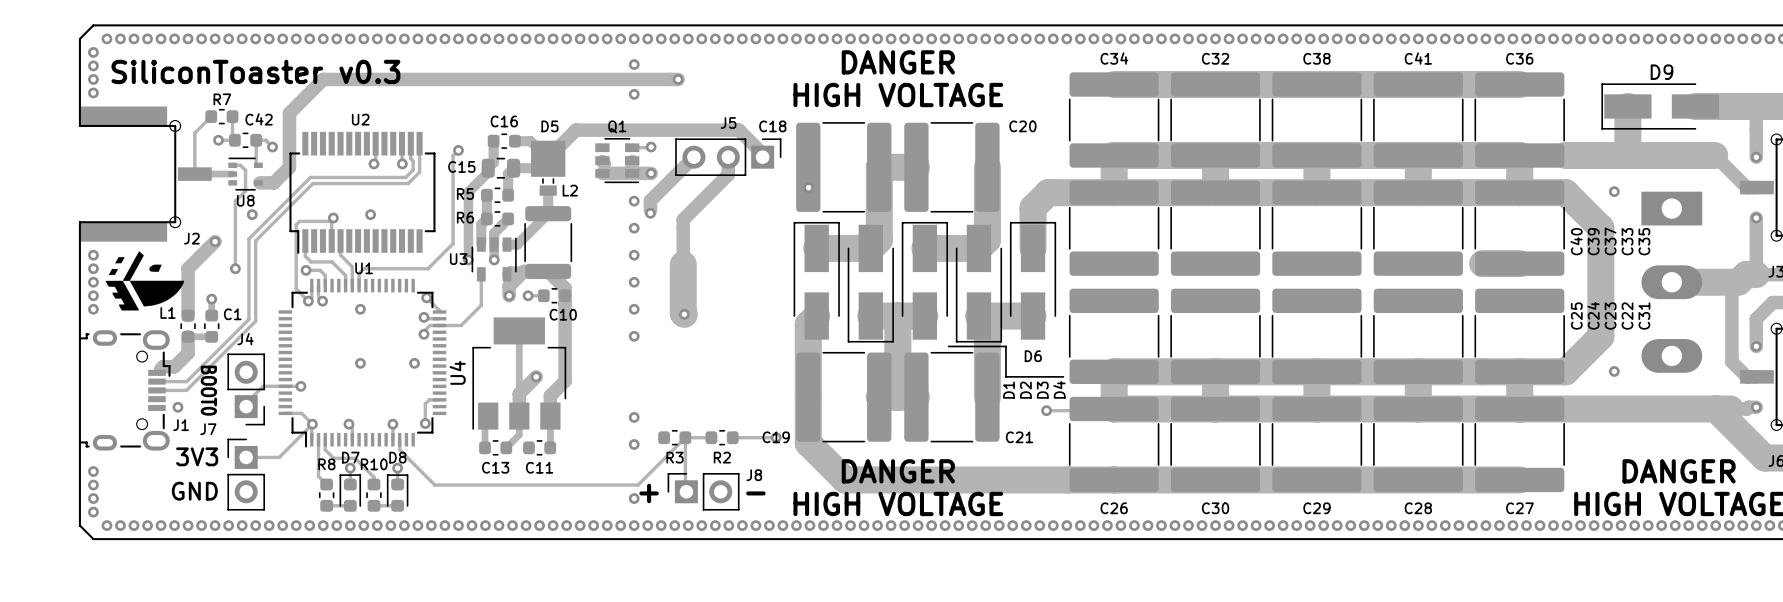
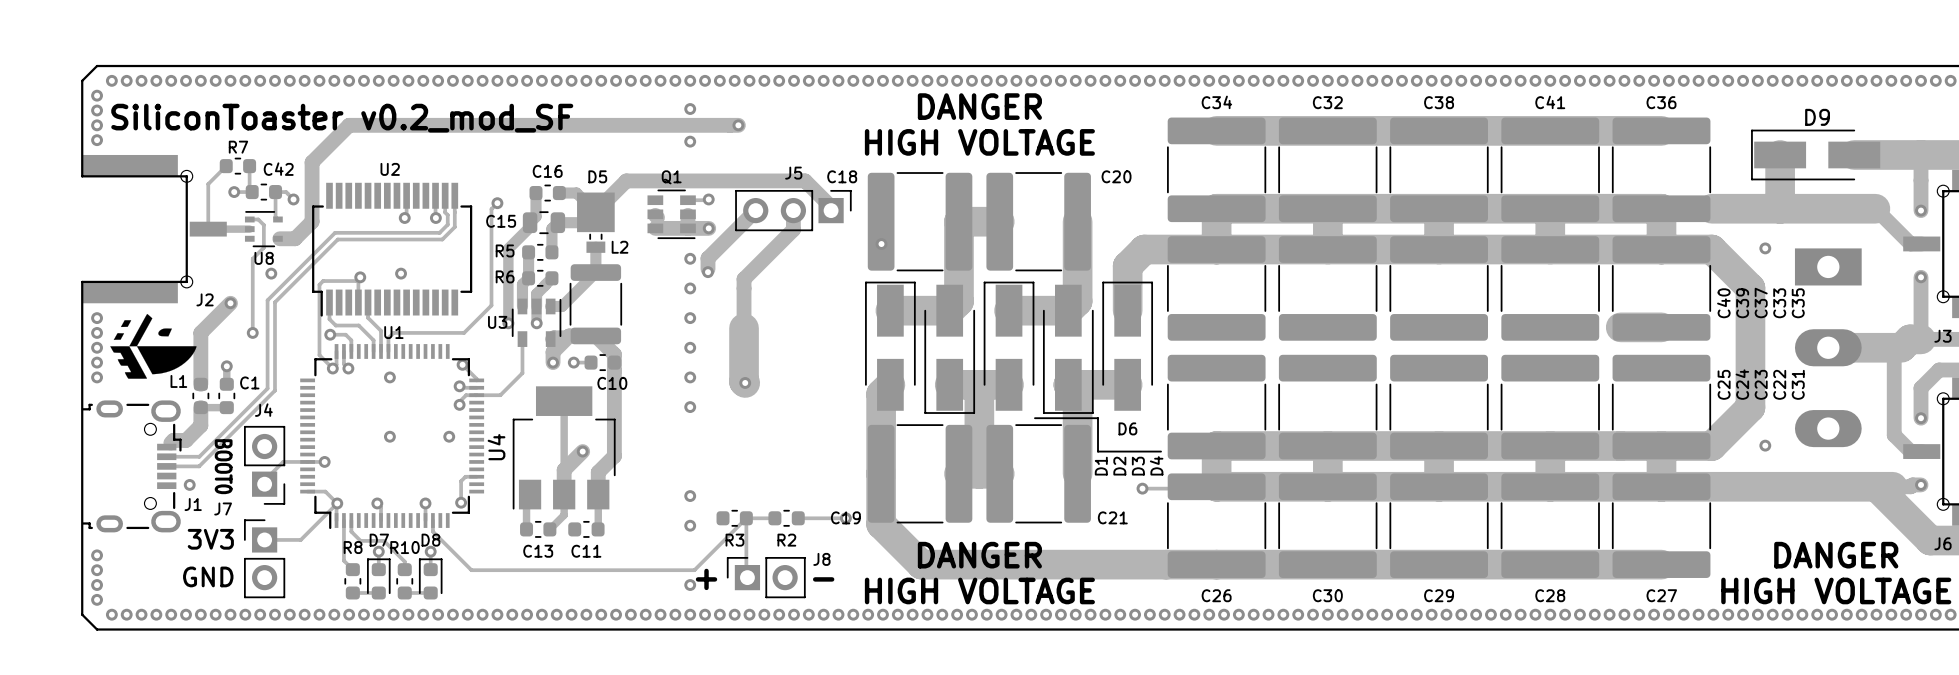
text: SiliconToaster v0.3 (255, 71) -> SiliconToaster v0.2_mod_SF (342, 118)

